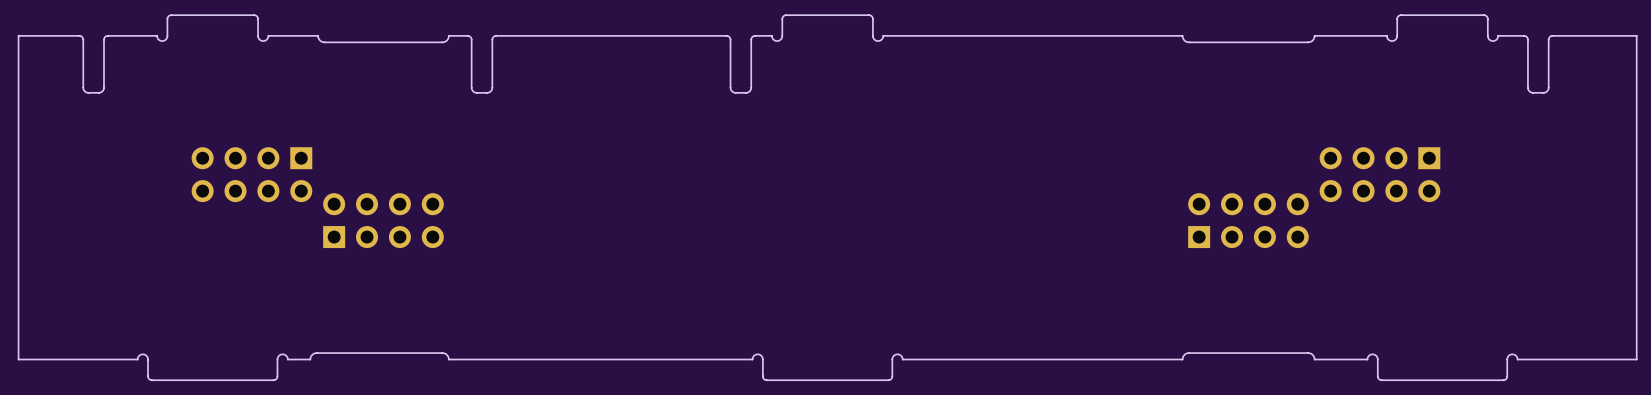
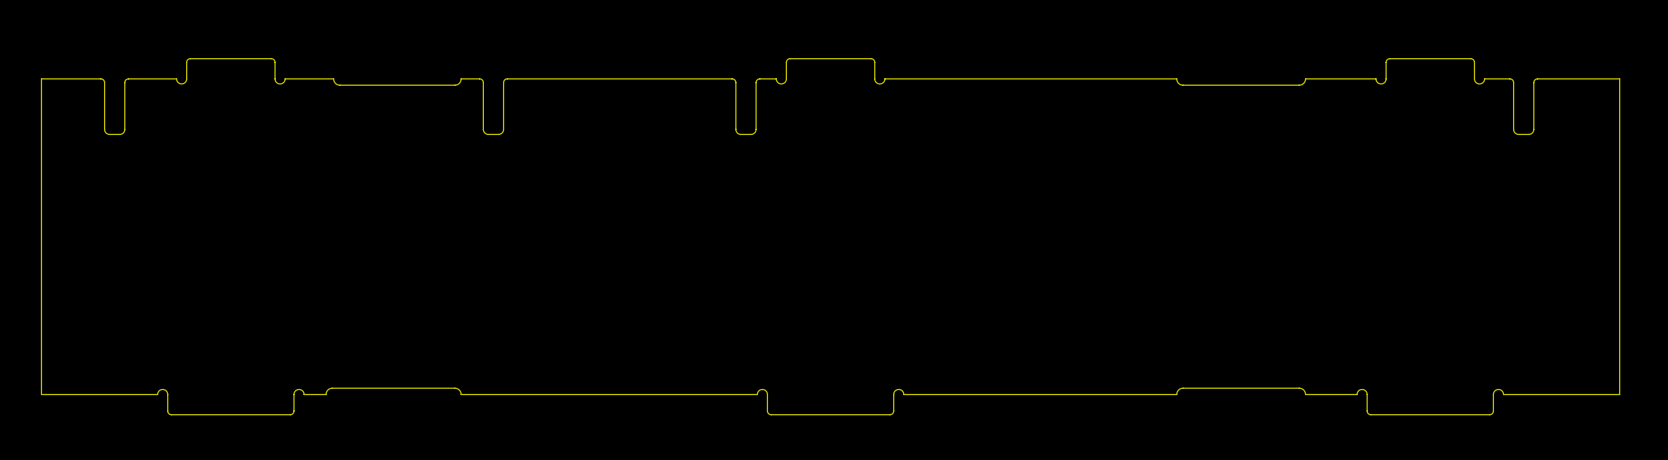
part: (251, 174) -> none
part: (1379, 174) -> none
part: (383, 220) -> none
part: (1248, 220) -> none

